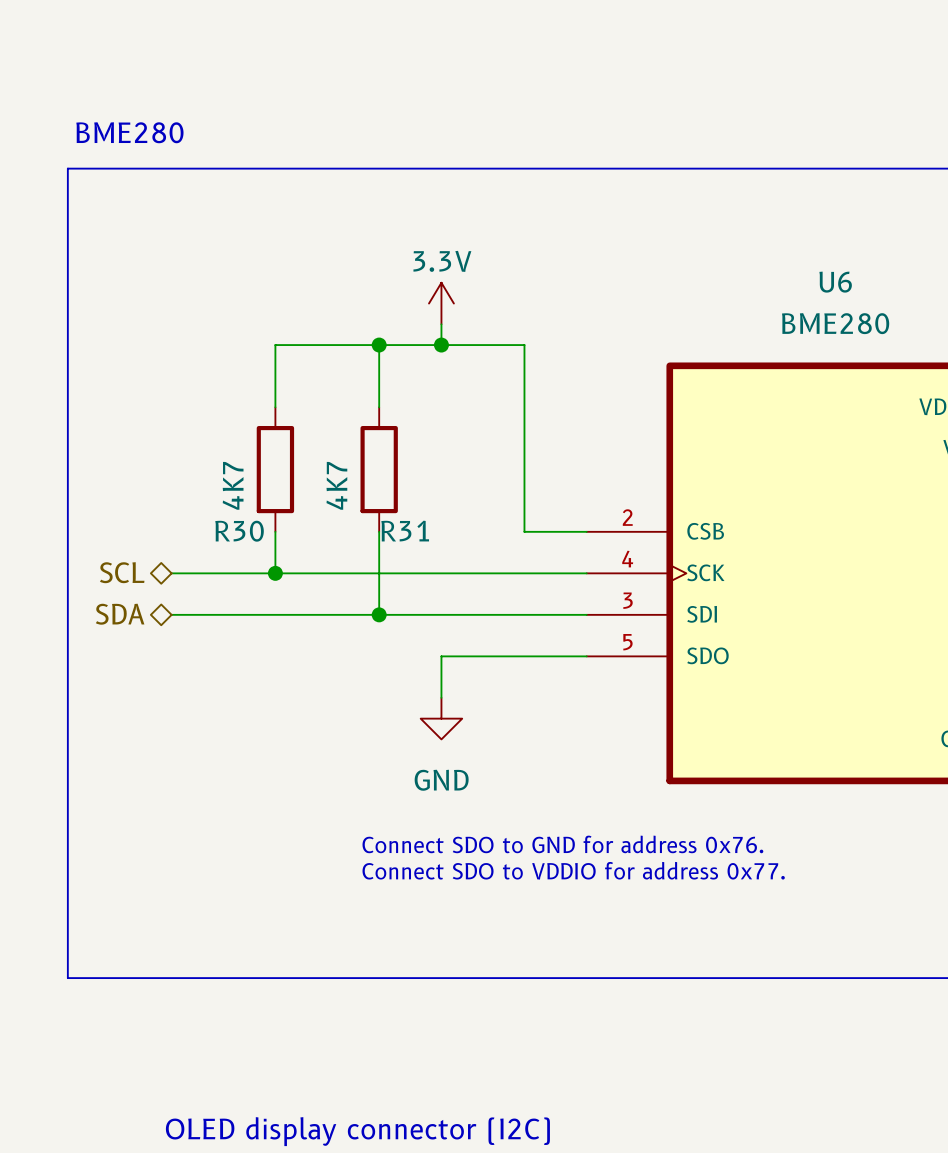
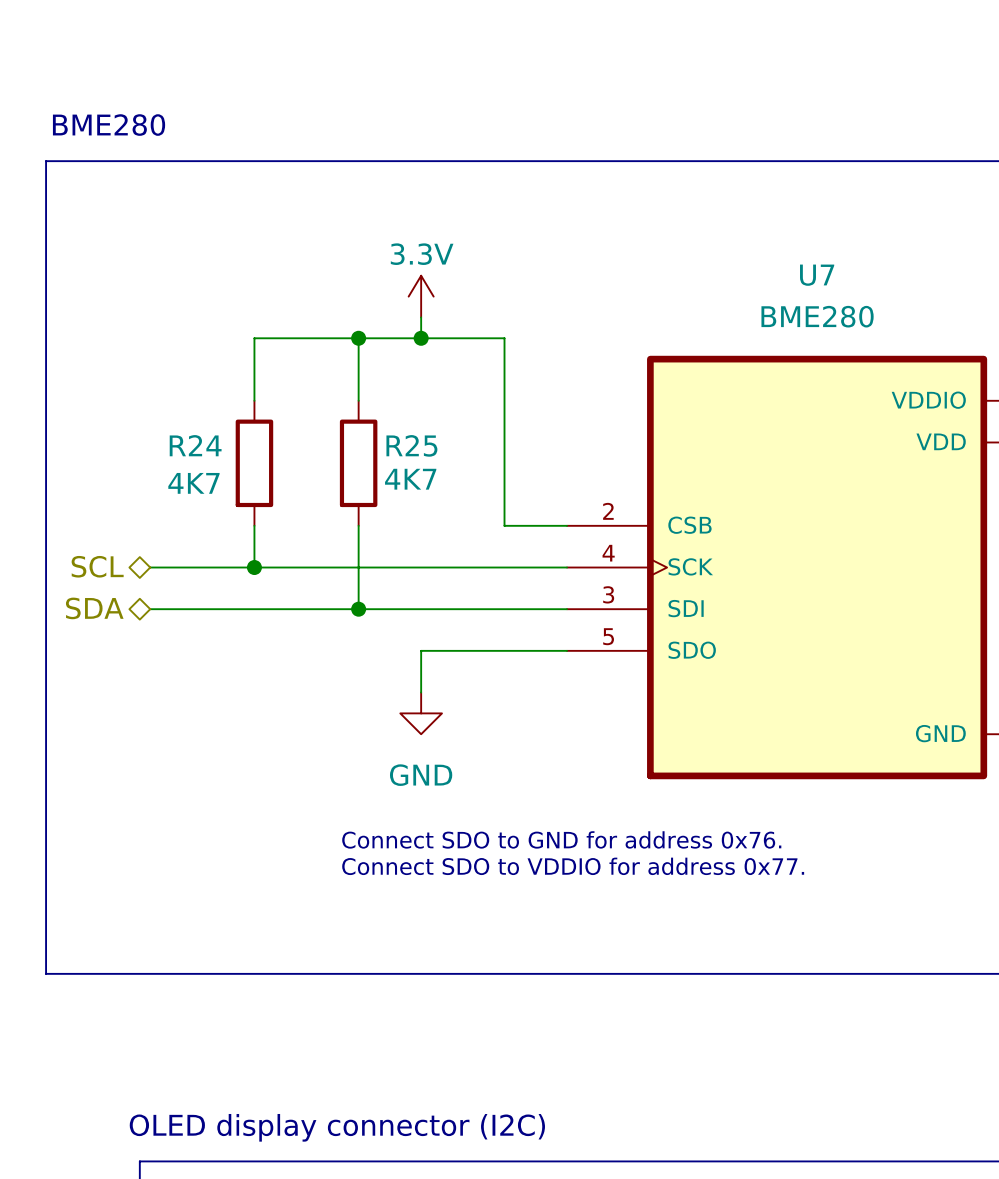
U6 name: U6 (835, 282) -> U7 (817, 275)
R30 value rotation: 0° (233, 485) -> 90° clockwise (193, 483)
R31 value rotation: 0° (336, 485) -> 90° clockwise (410, 479)
R31 value position: 4K7 (336, 485) -> 4K7 (410, 479)
R30 name: R30 (239, 531) -> R24 (195, 445)
R31 name: R31 (405, 531) -> R25 (411, 445)

